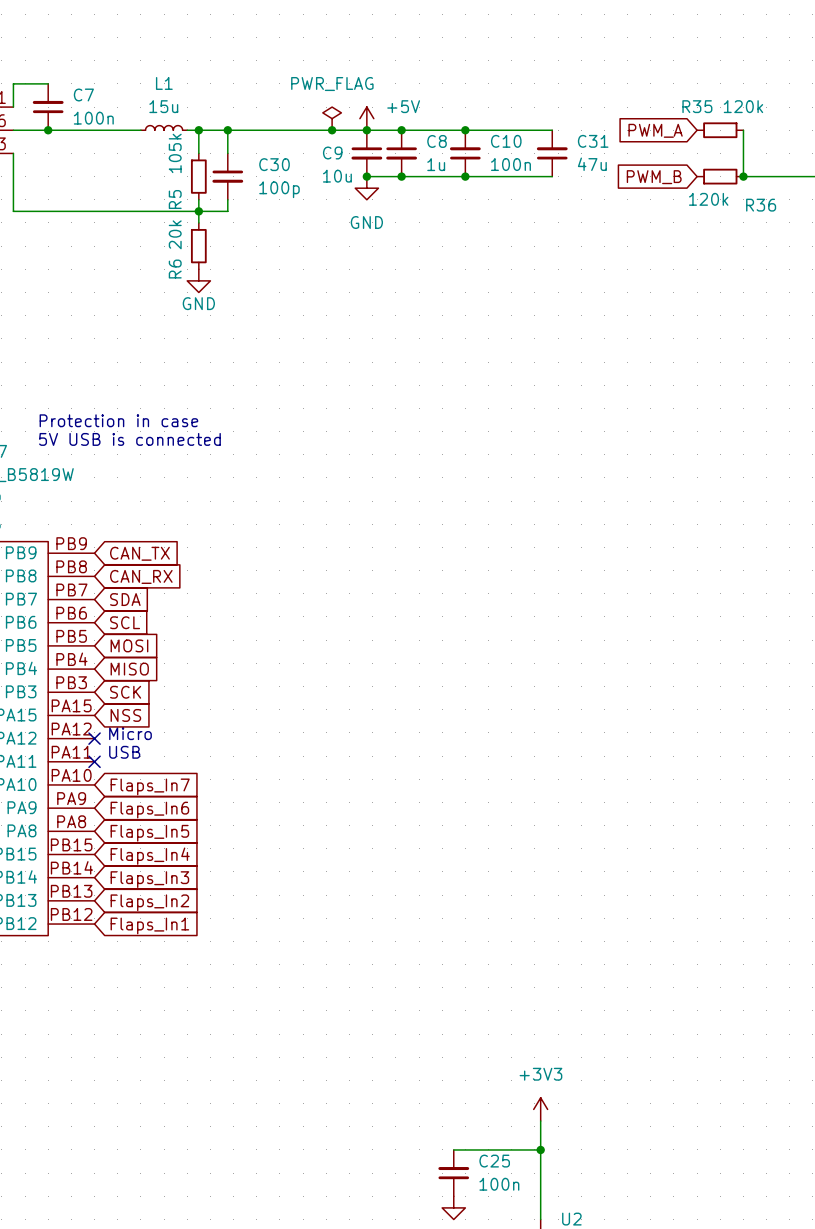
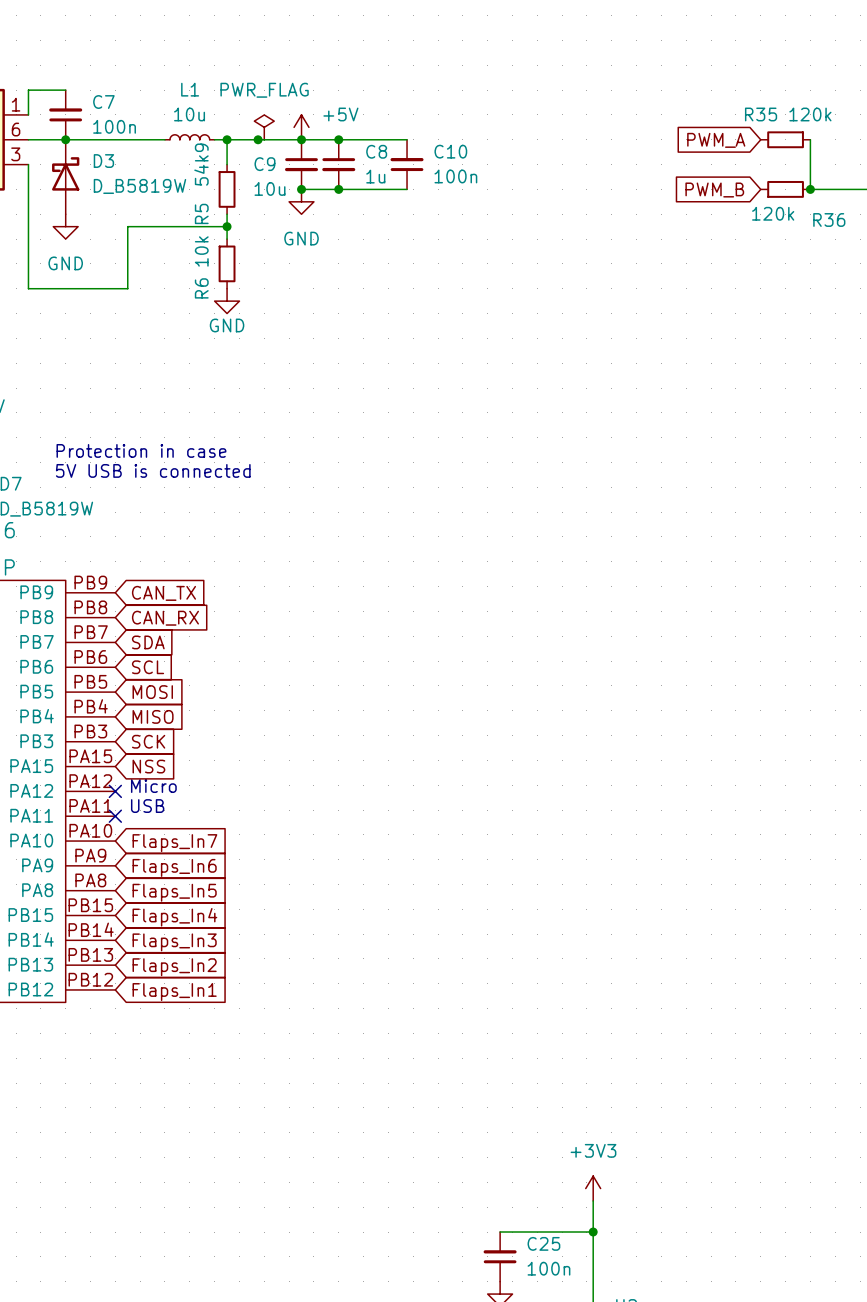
L1 value: 15u (163, 106) -> 10u (189, 114)
power symbol position: PWR_FLAG (332, 118) -> PWR_FLAG (264, 127)
power symbol position: +5V (366, 118) -> +5V (301, 127)
wire: (227, 130) (227, 153) -> none
junction: none -> (301, 139)
junction: none -> (338, 139)
junction: (332, 130) -> none
wire: (366, 130) (552, 130) -> none
junction: (366, 130) -> none
junction: (401, 130) -> none
junction: (465, 130) -> none
R5 value: 105k (175, 153) -> 54k9 (201, 164)
C9 position: (366, 153) -> (301, 164)
C8 position: (401, 153) -> (338, 164)
C10 position: (465, 153) -> (407, 164)
C31: 47u (552, 153) -> none
D3: none -> D_B5819W (65, 177)
C30: 100p (227, 176) -> none
junction: none -> (301, 189)
junction: none -> (338, 189)
wire: (366, 176) (552, 176) -> (407, 189) (301, 189)
junction: (366, 176) -> none
junction: (401, 176) -> none
junction: (465, 176) -> none
power symbol position: GND (366, 188) -> GND (301, 201)
wire: (227, 199) (227, 211) (198, 211) -> none
wire: (13, 211) (106, 211) -> (28, 226) (28, 288) (127, 288) (127, 226)
power symbol: none -> GND (65, 226)
R6 value: 20k (175, 234) -> 10k (201, 251)

